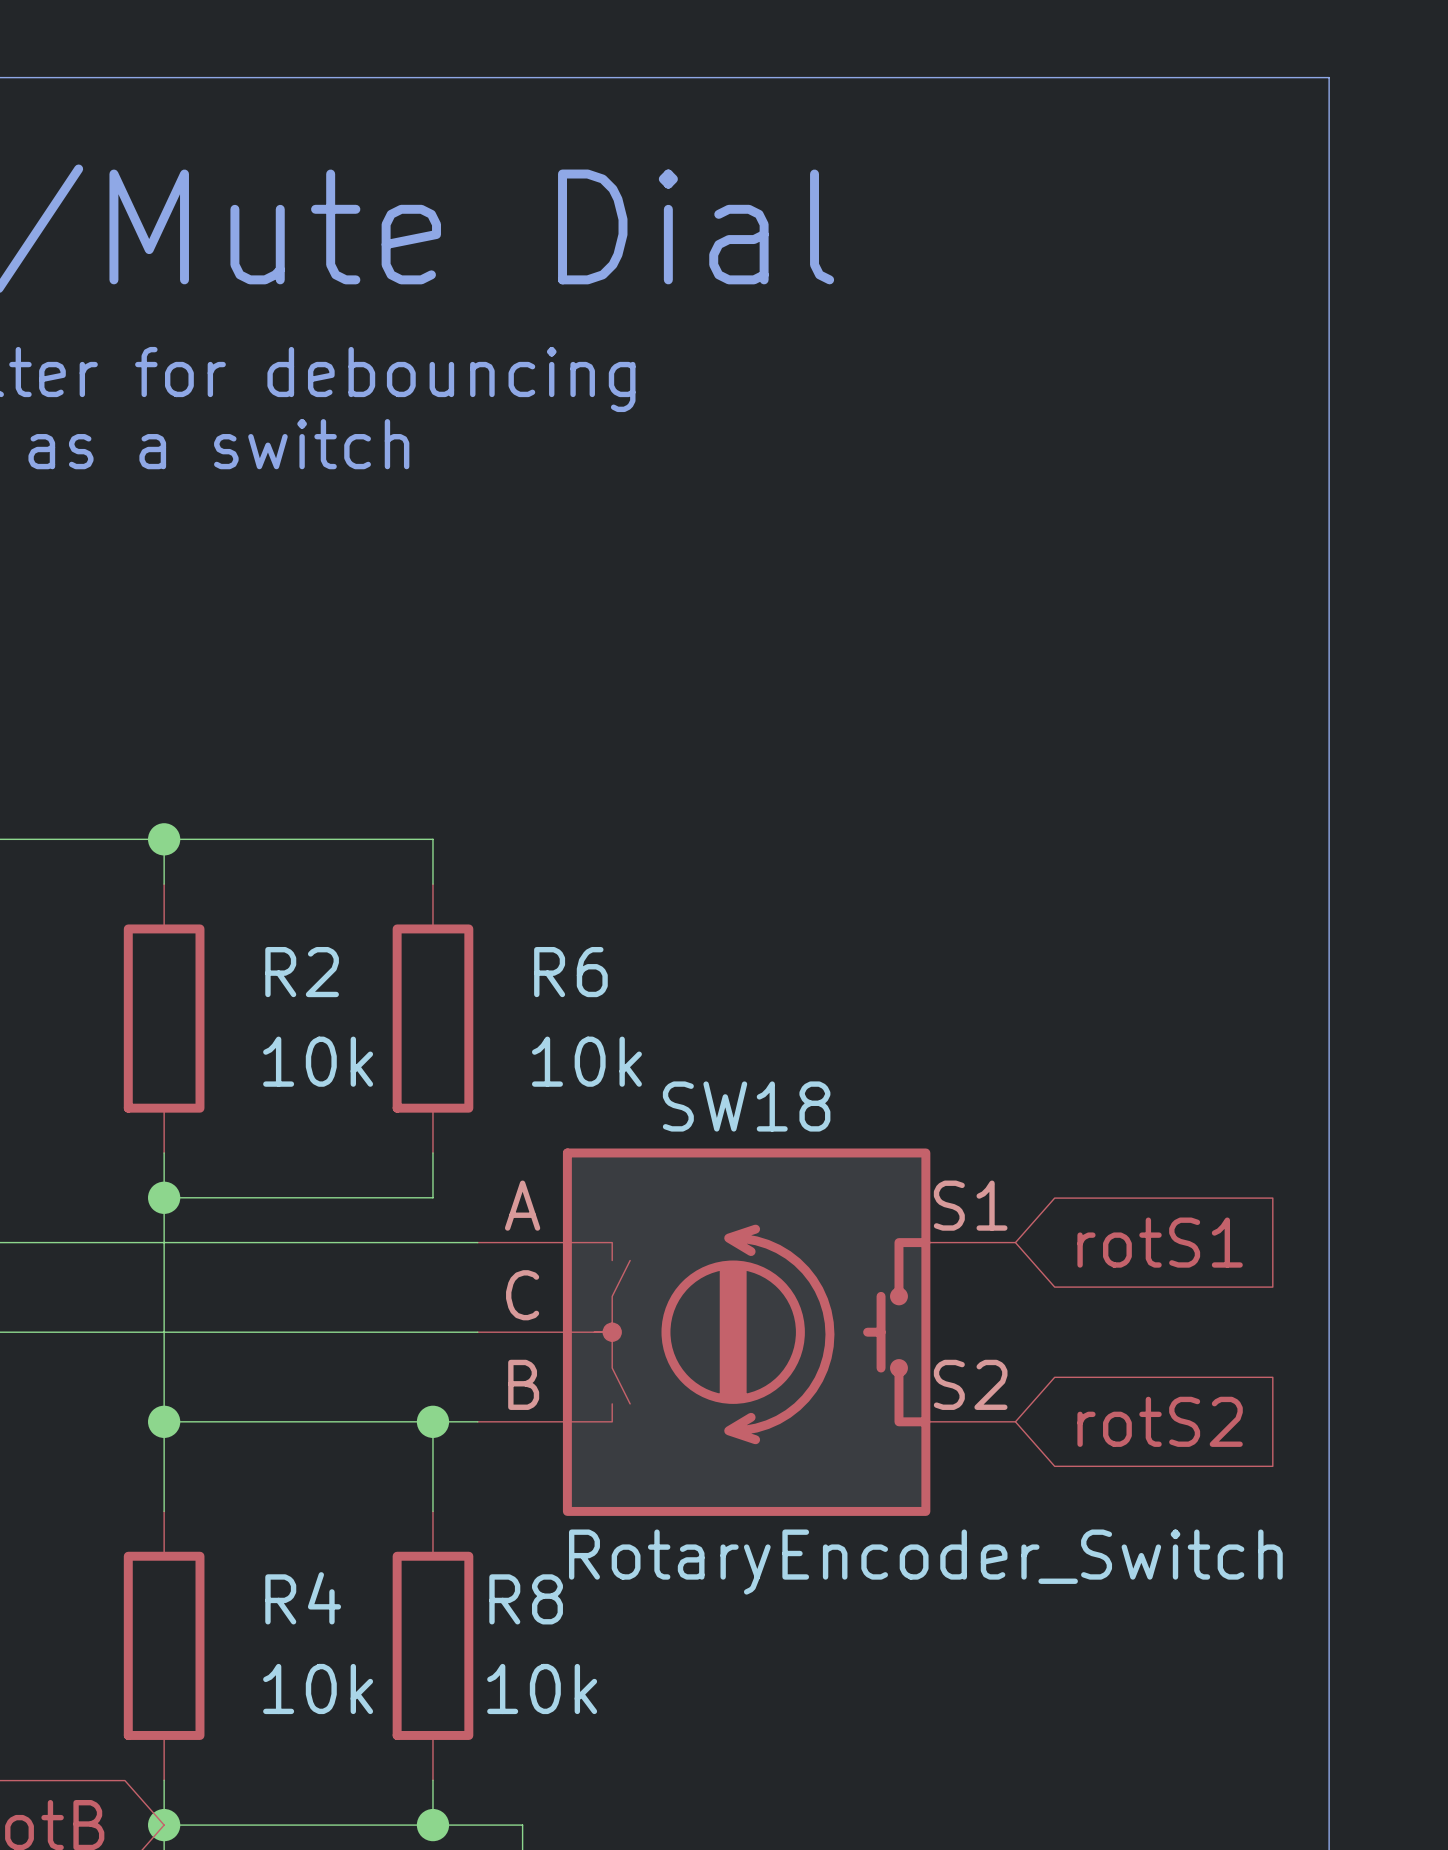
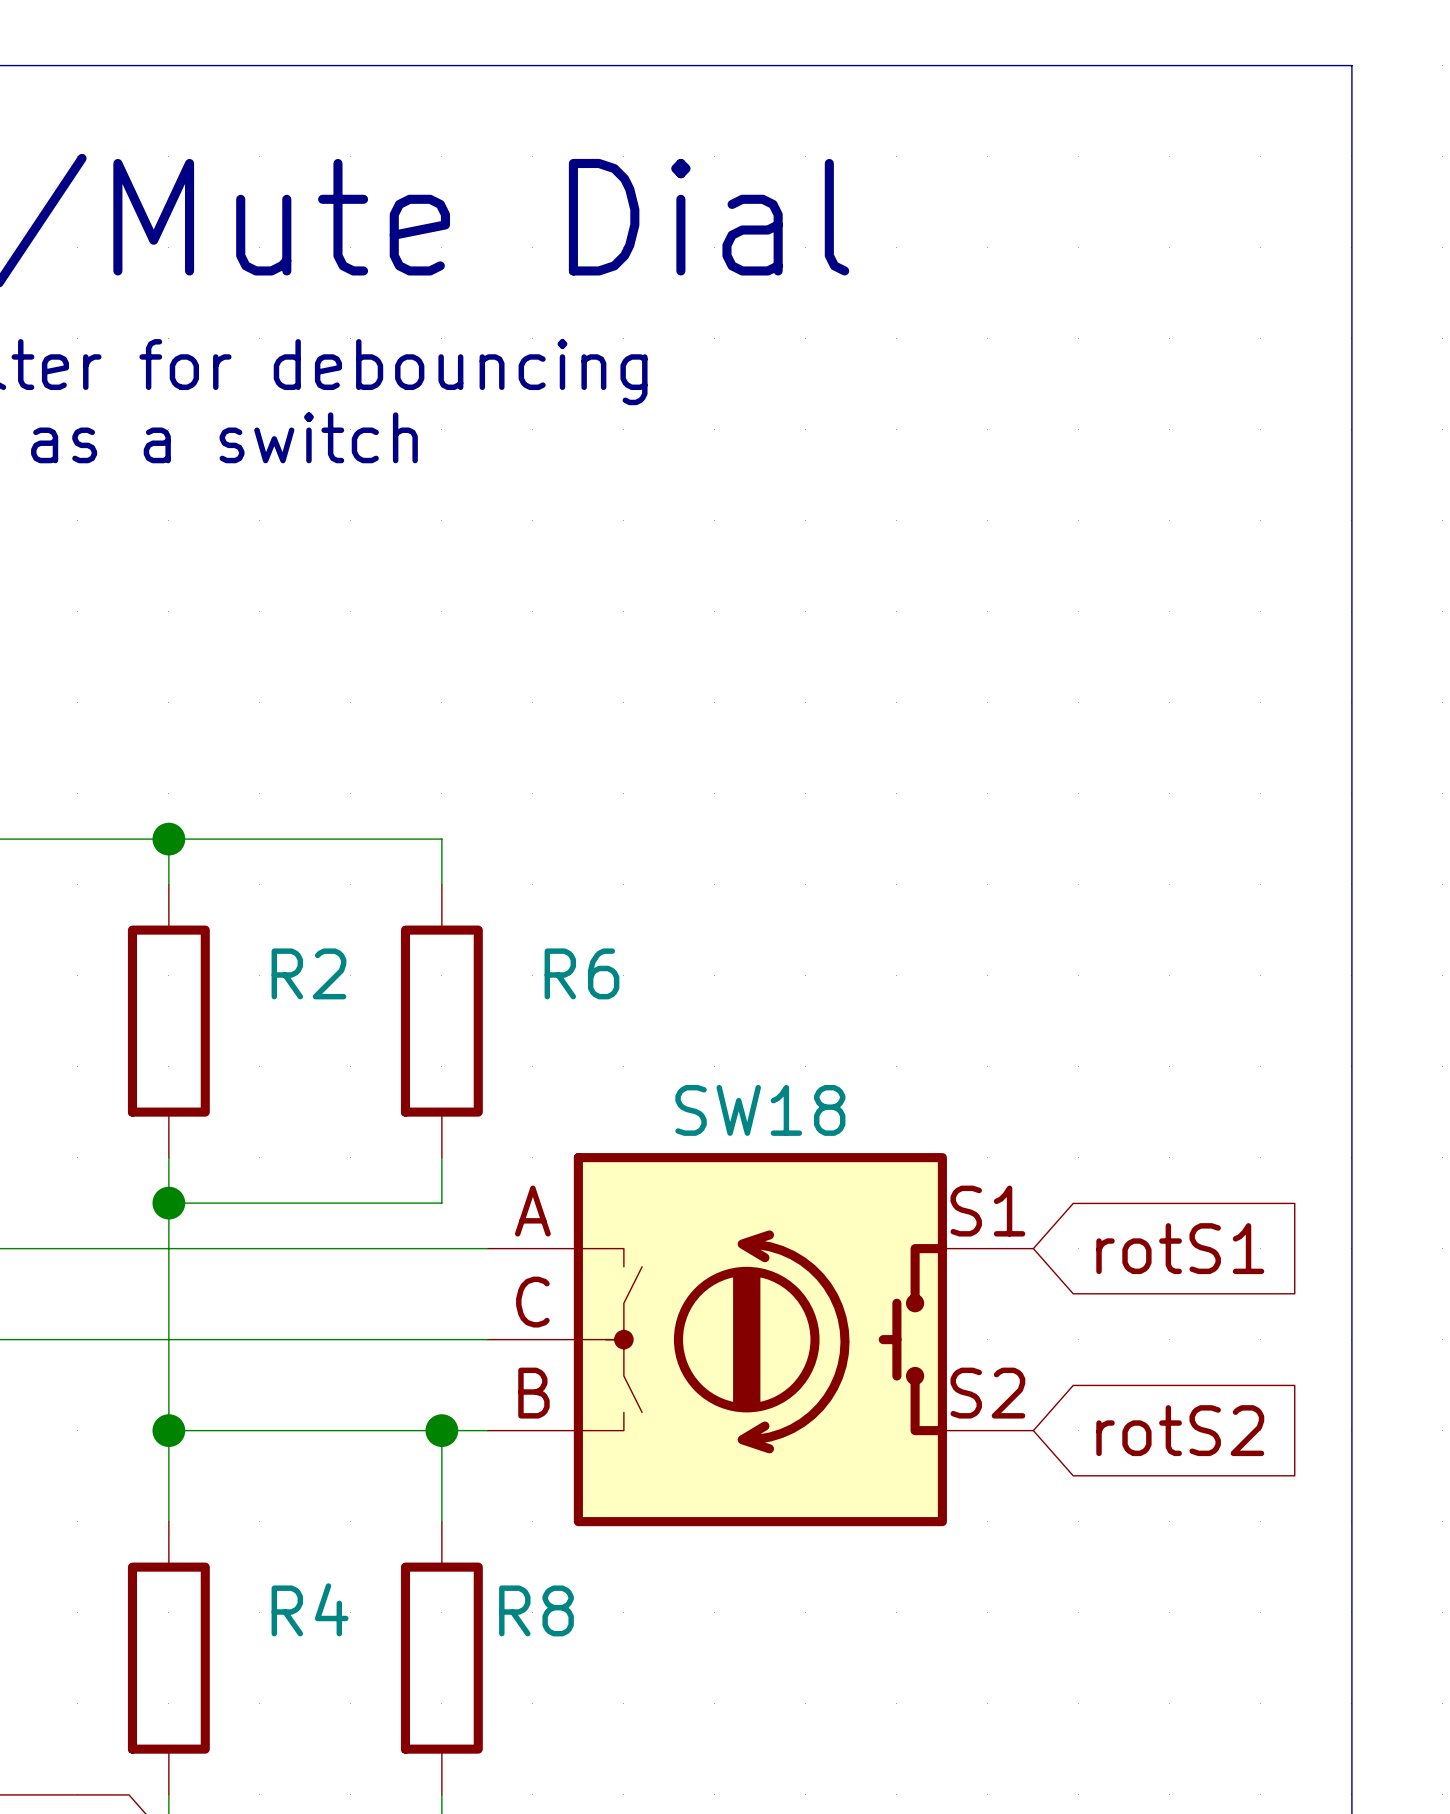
R2 value: 10k (318, 1061) -> none
R6 value: 10k (586, 1061) -> none
SW18 value: RotaryEncoder_Switch (925, 1562) -> none
R4 value: 10k (318, 1688) -> none
R8 value: 10k (542, 1688) -> none

